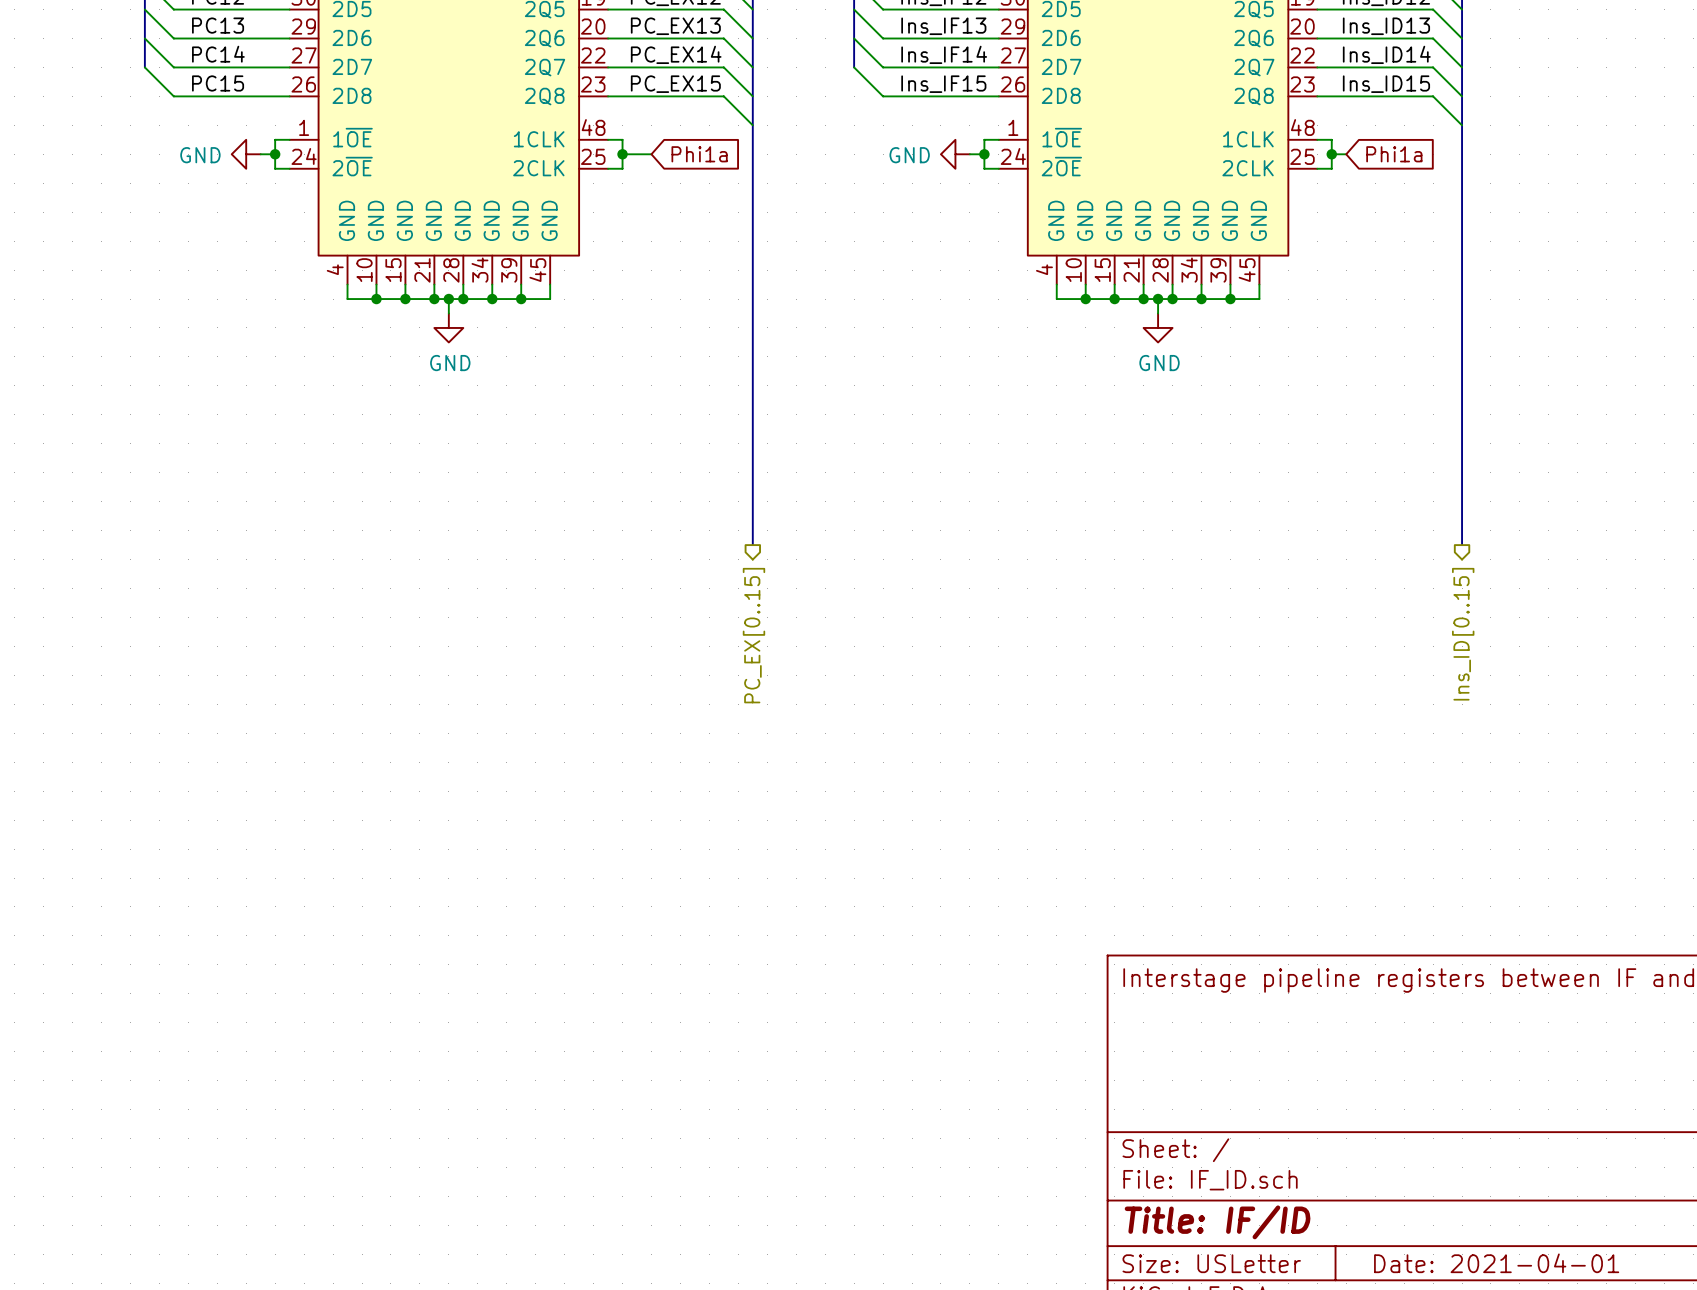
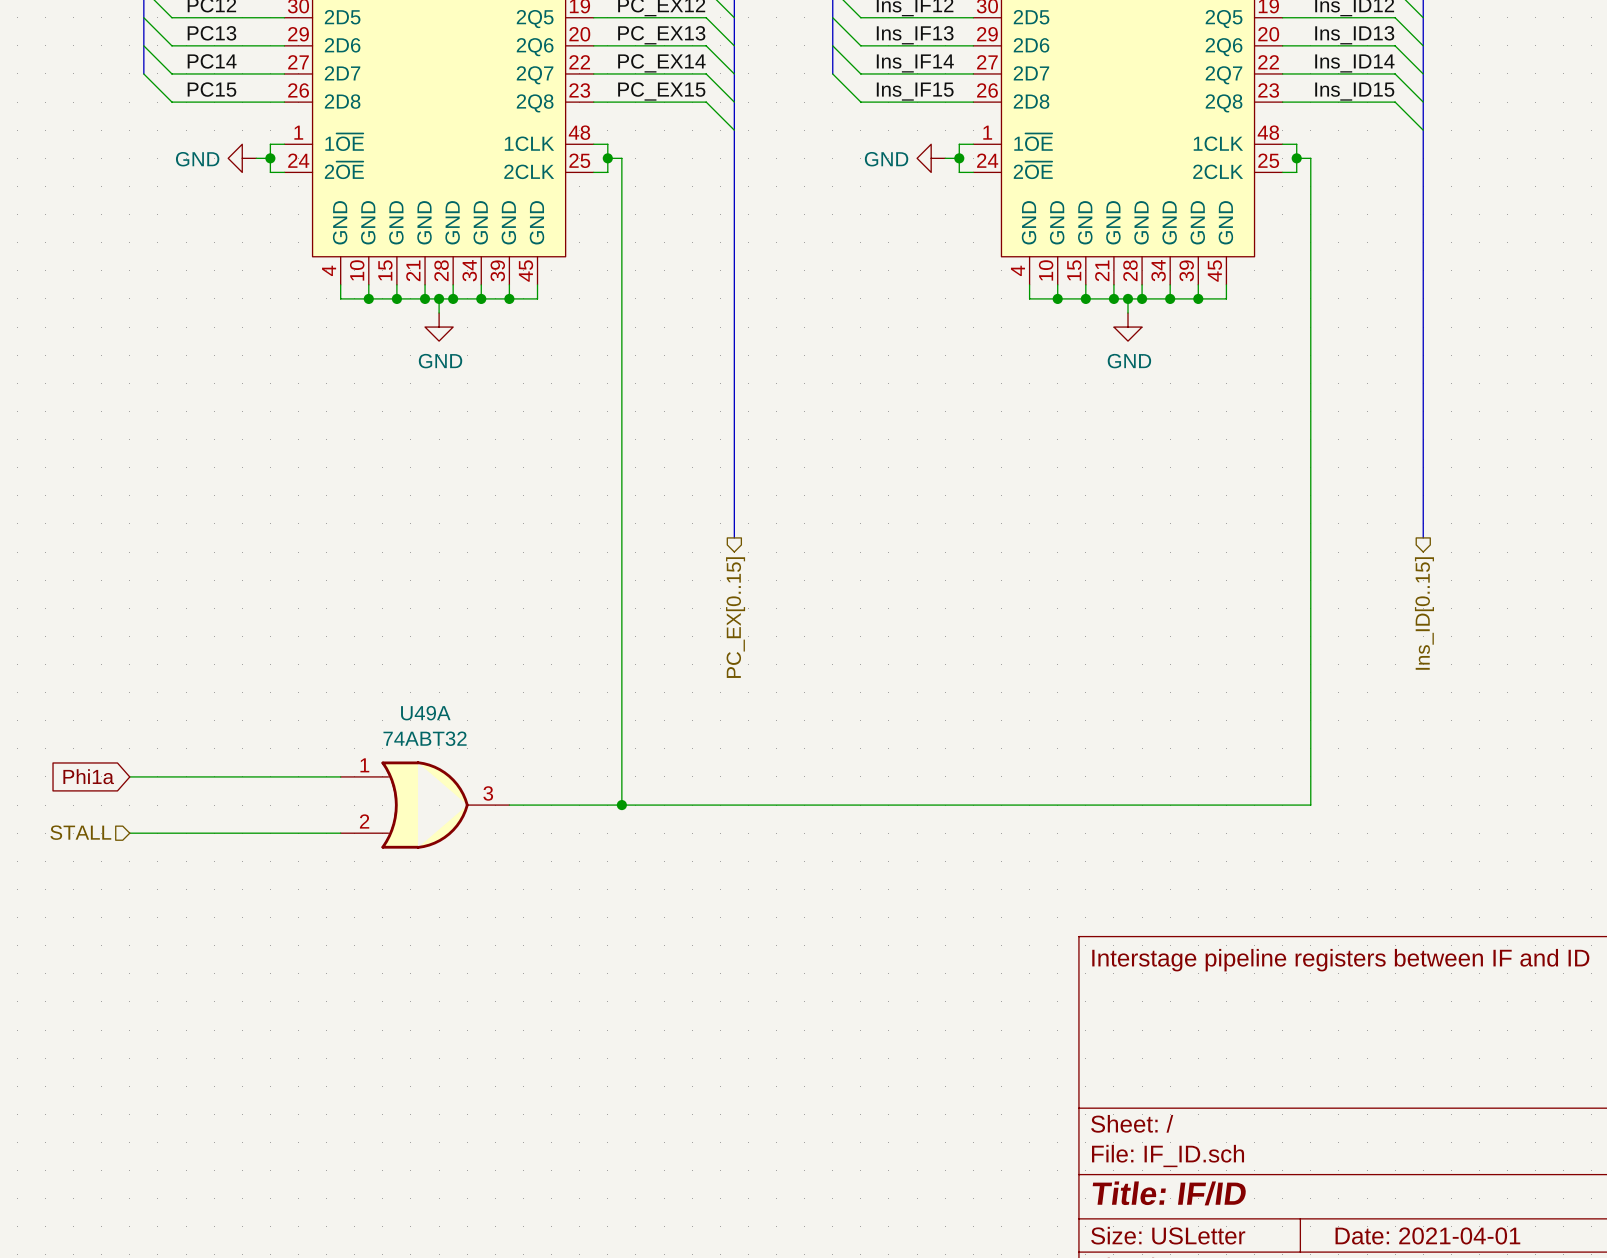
wire: (637, 154) (651, 154) -> (621, 158) (621, 805)
global label: Phi1a (699, 154) -> none
wire: none -> (1310, 158) (1310, 805) (509, 805)
global label: Phi1a (1394, 154) -> none
global label: none -> Phi1a (88, 776)
wire: none -> (129, 776) (340, 776)
U49A: none -> 74ABT32 (425, 805)
junction: none -> (621, 805)
hierarchical label: none -> STALL (80, 832)
wire: none -> (129, 833) (340, 833)

